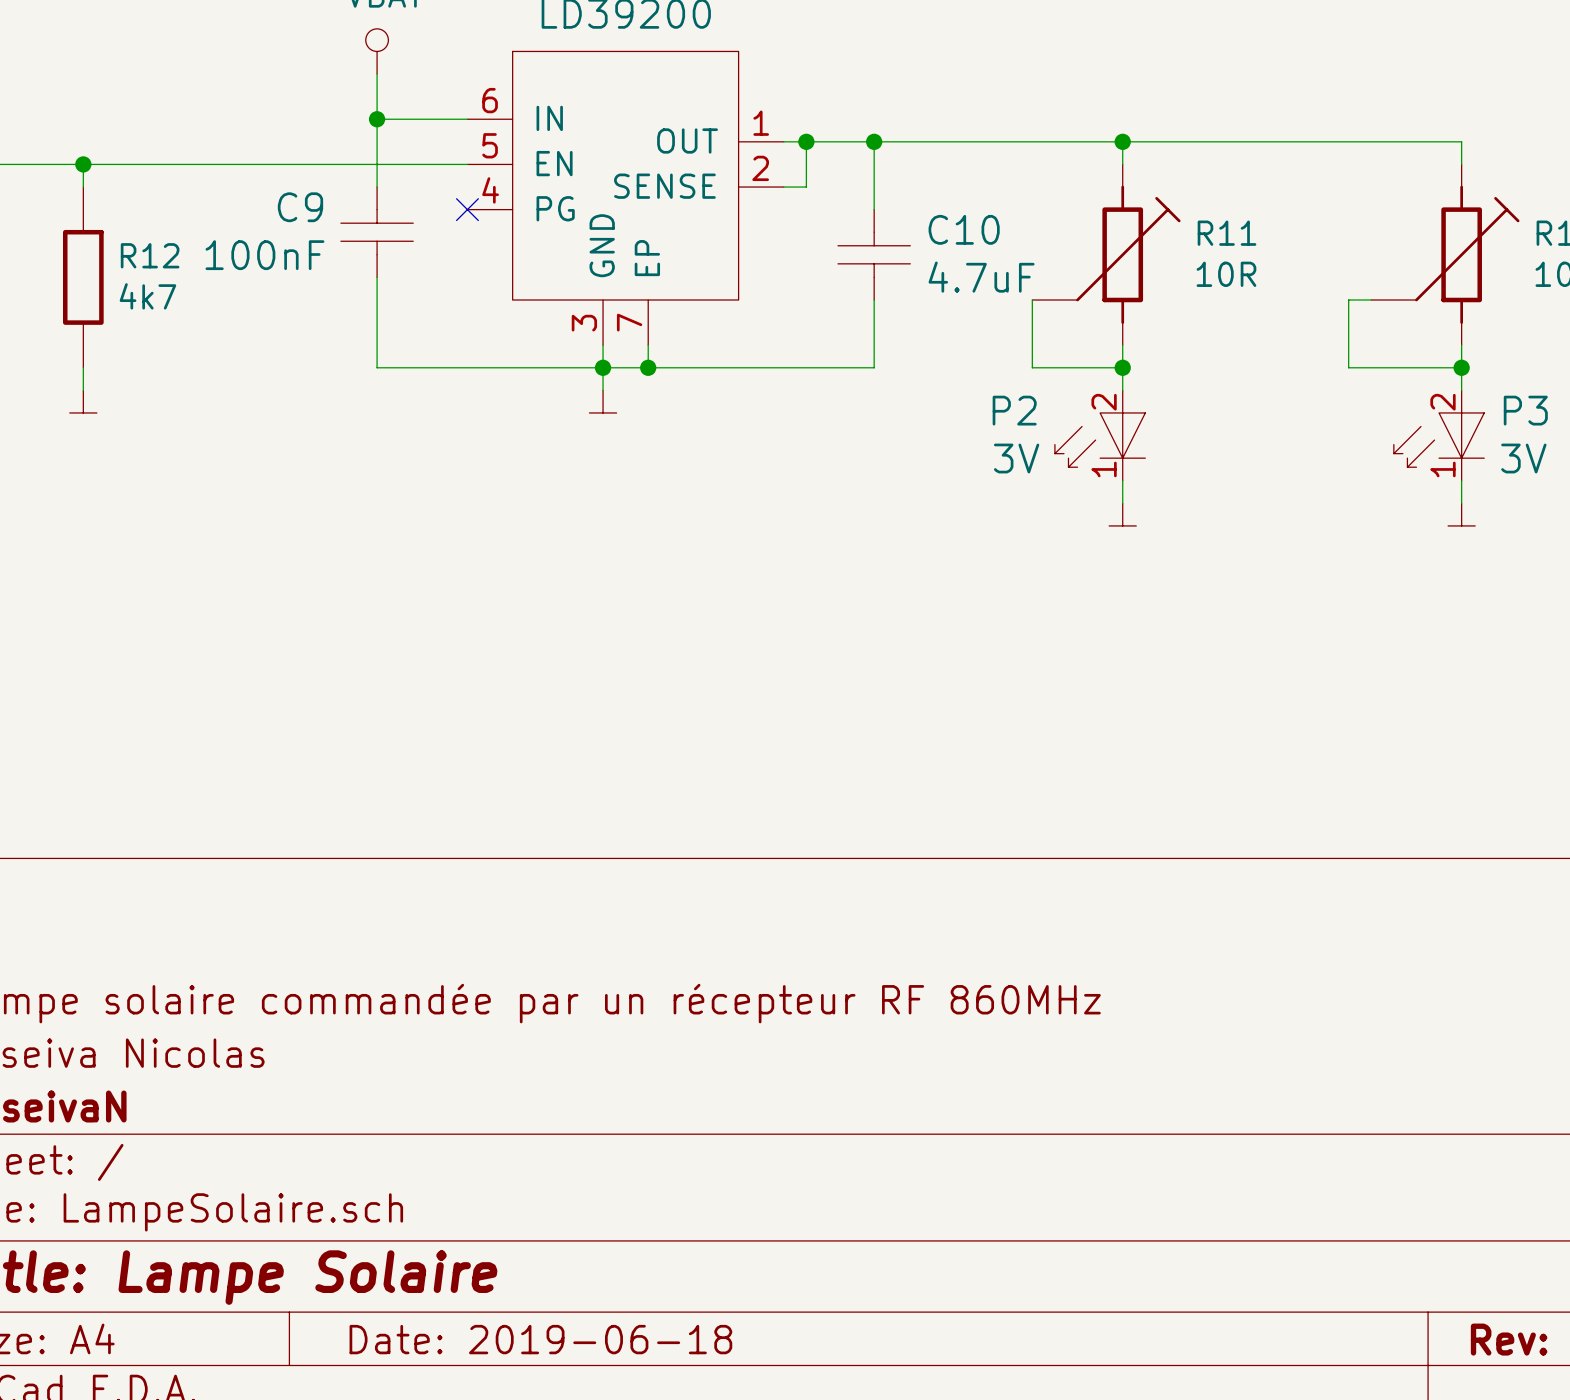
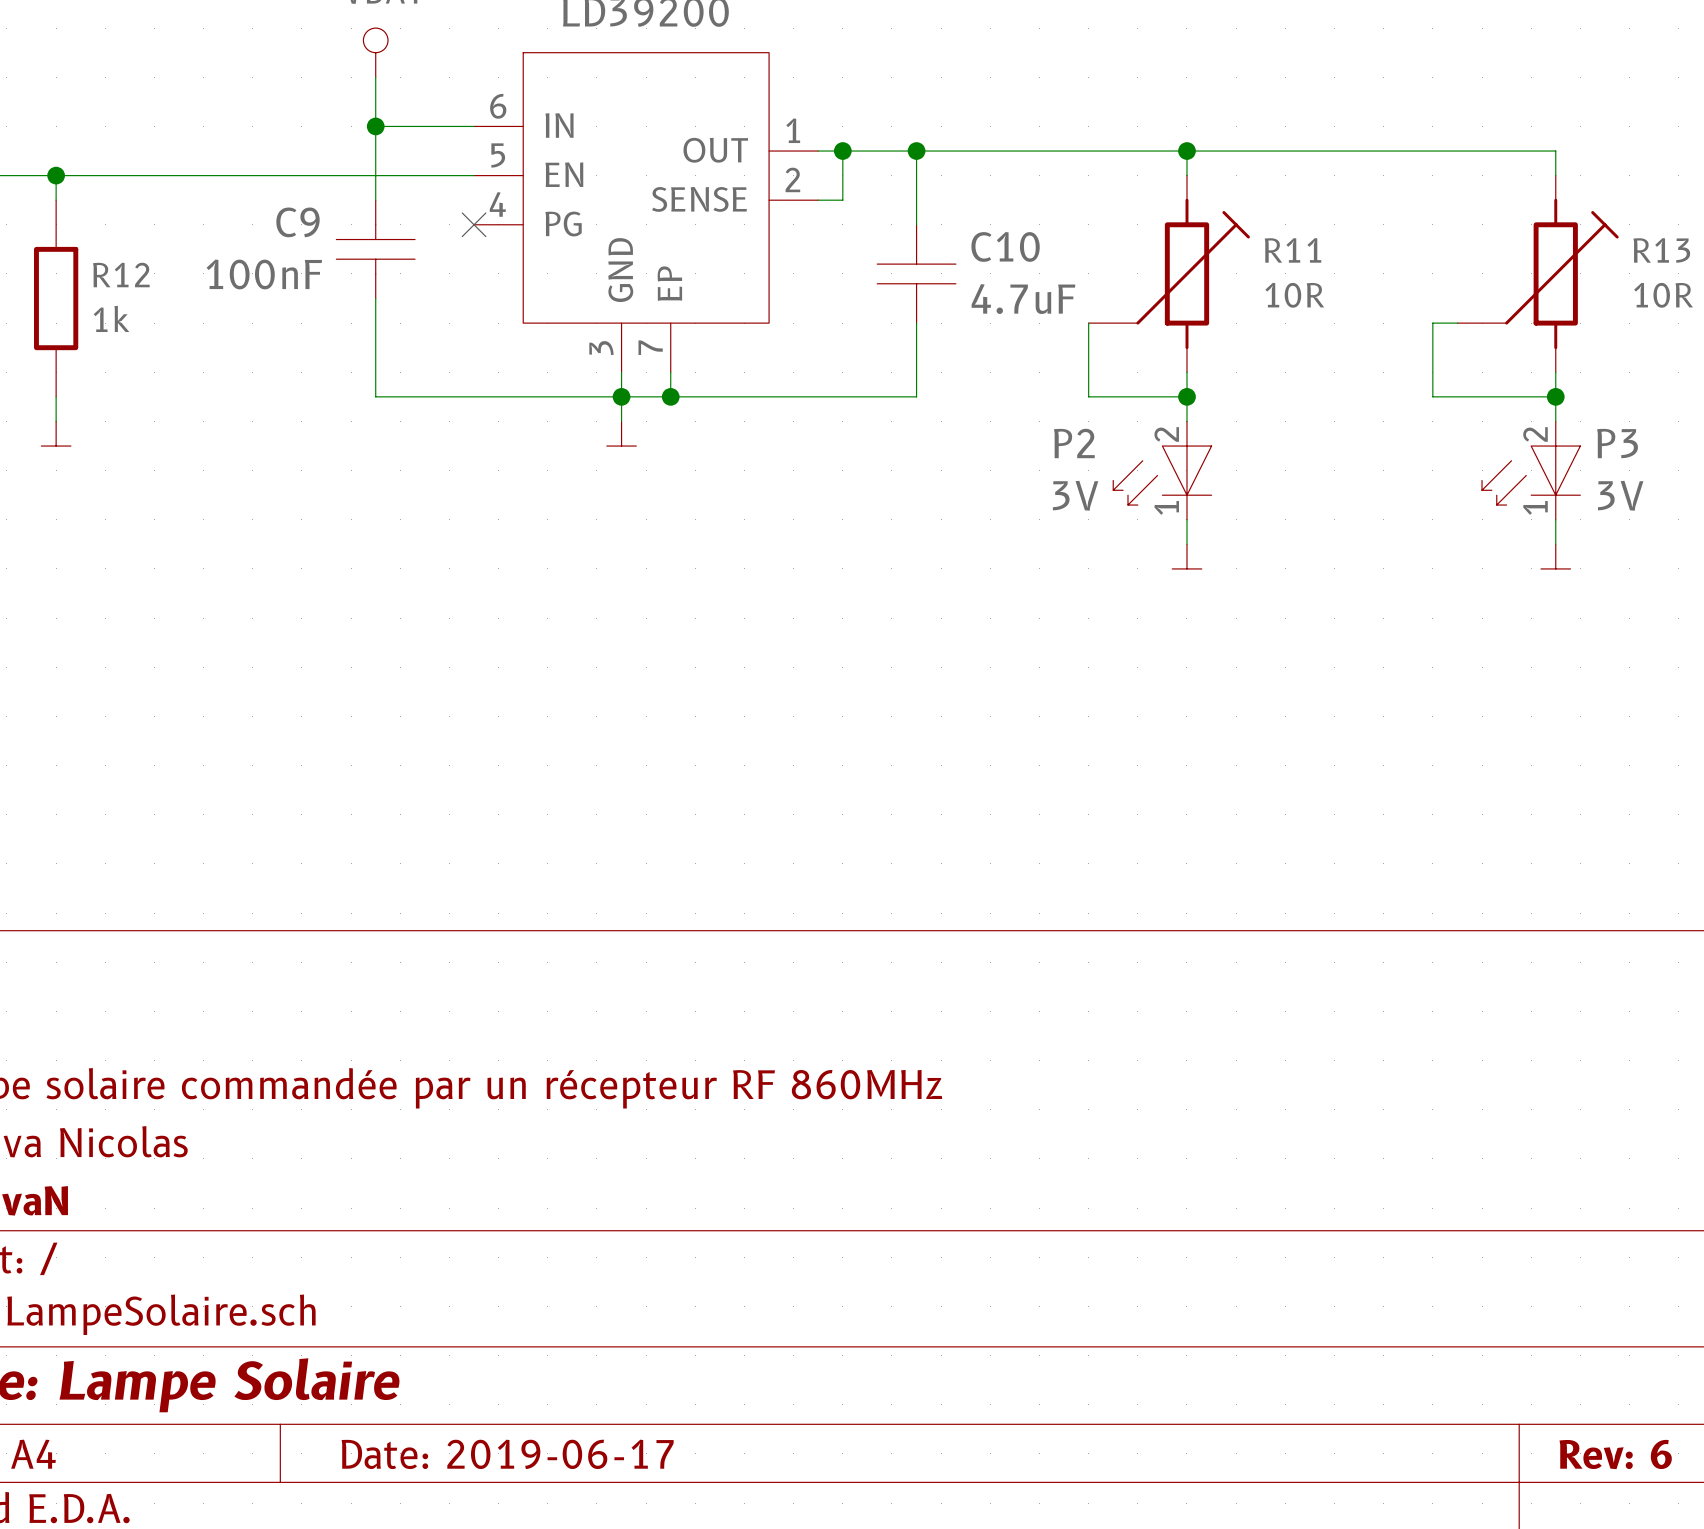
R12 value: 4k7 (147, 296) -> 1k (111, 318)
title block: Date: 2019-06-18 (540, 1339) -> Date: 2019-06-17 (507, 1454)

